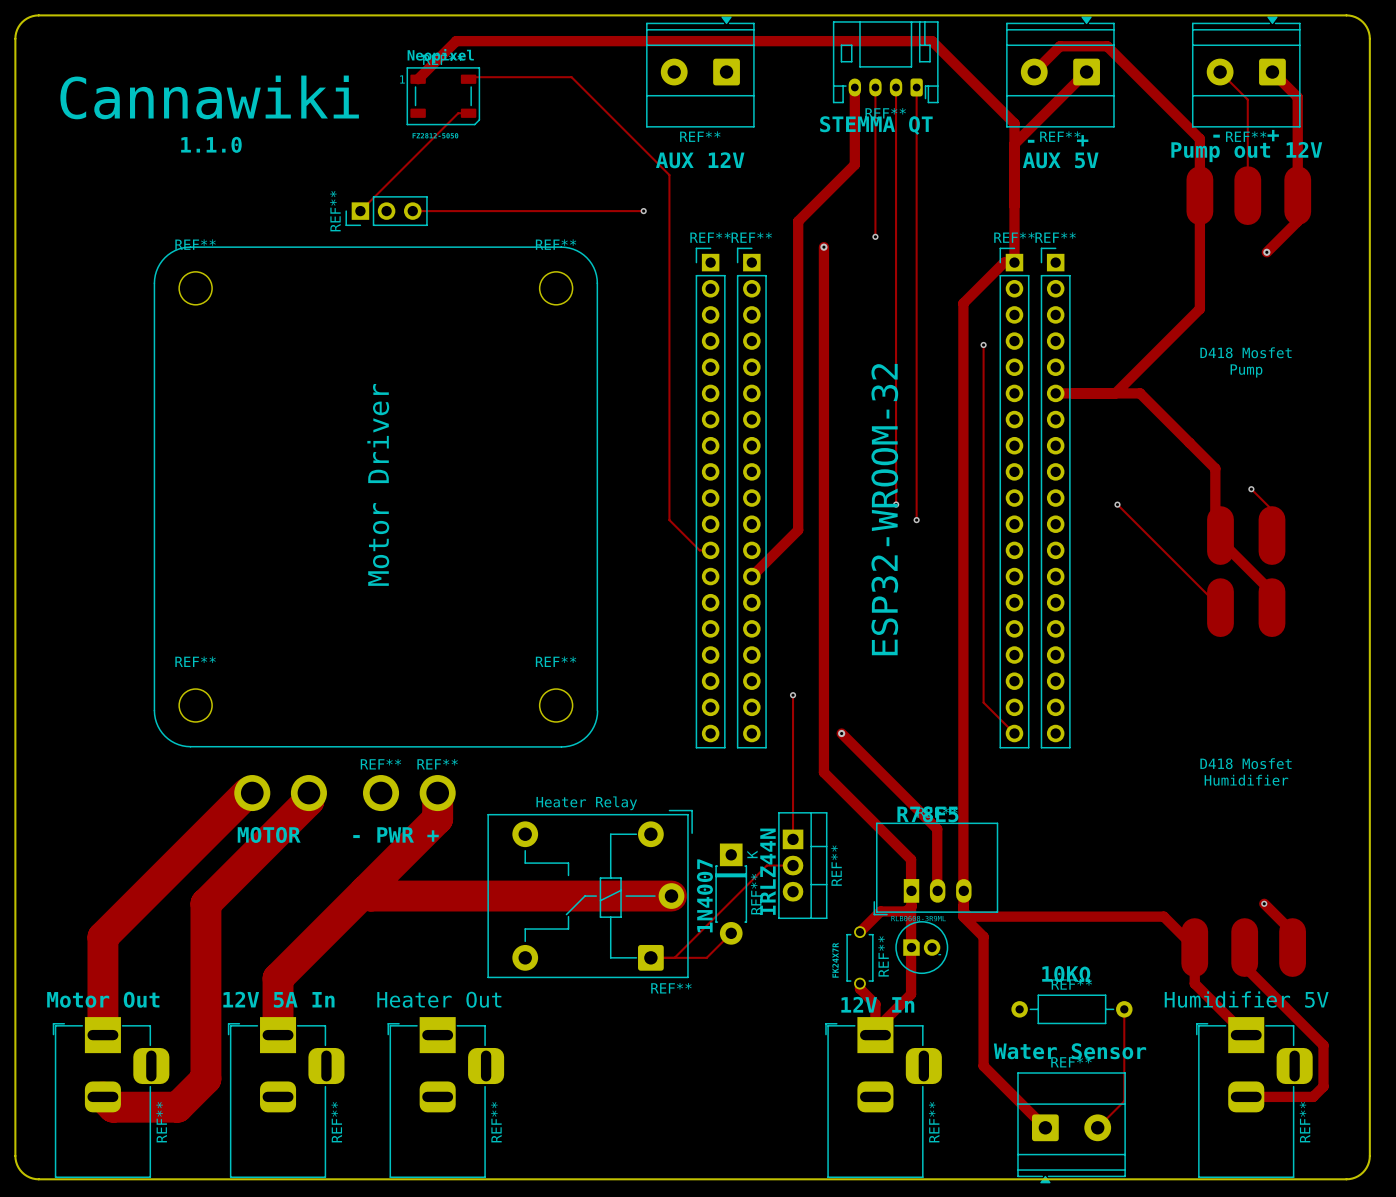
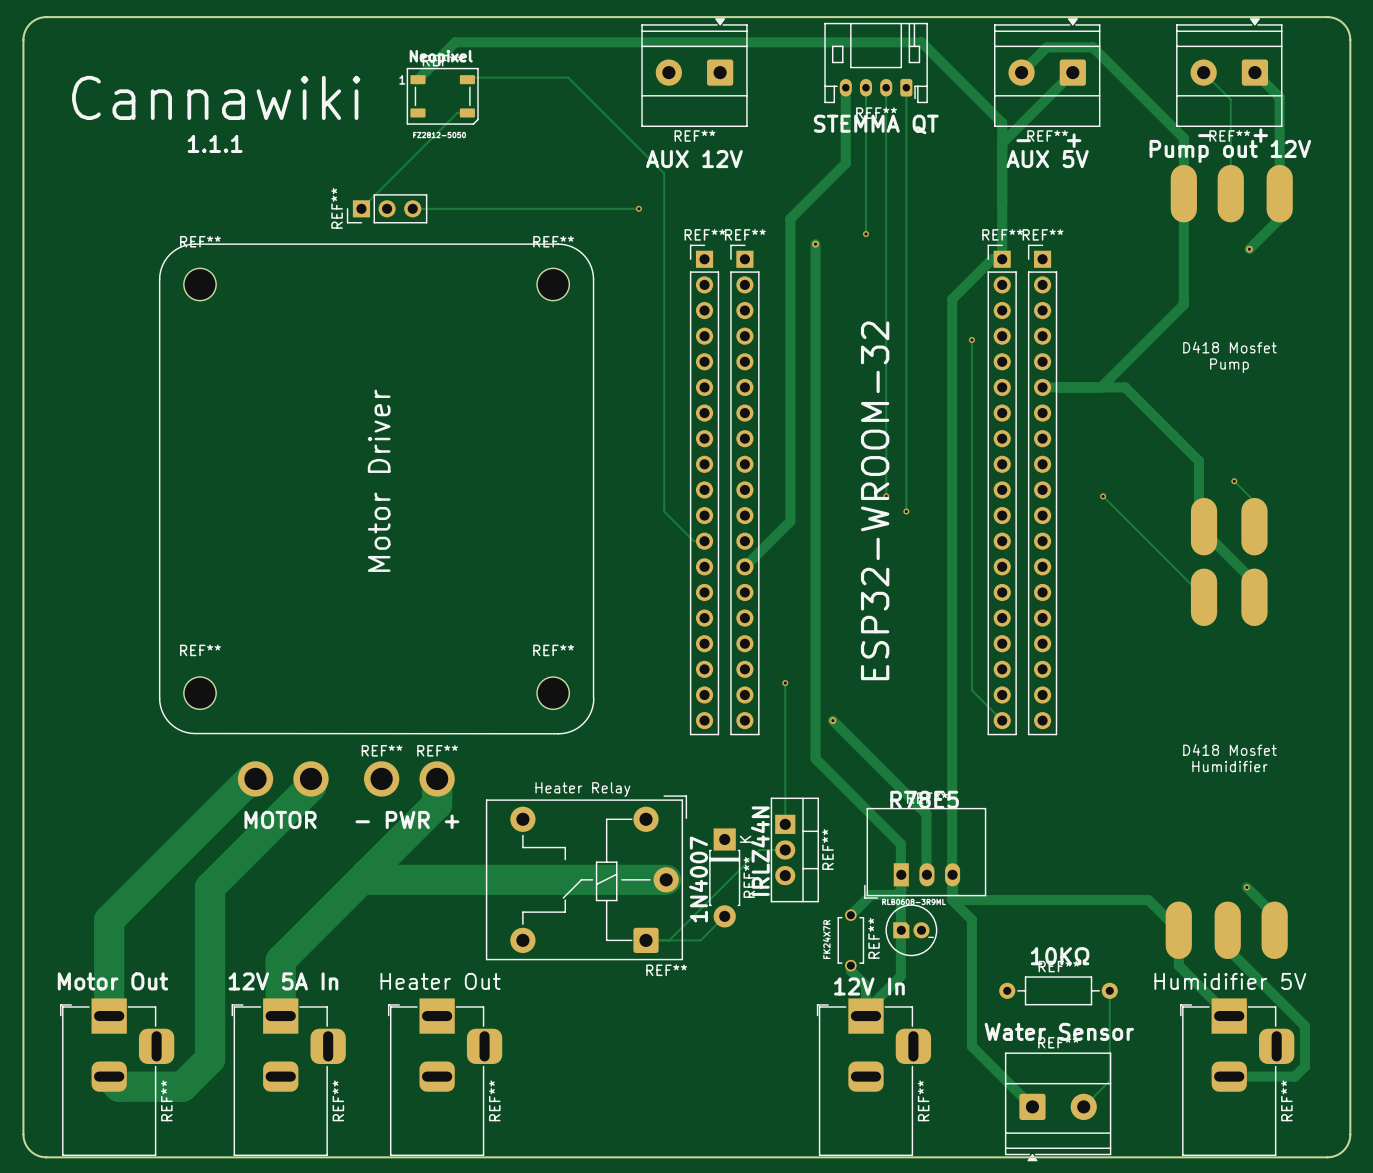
text: 1.1.0 (211, 144) -> 1.1.1 (215, 143)

